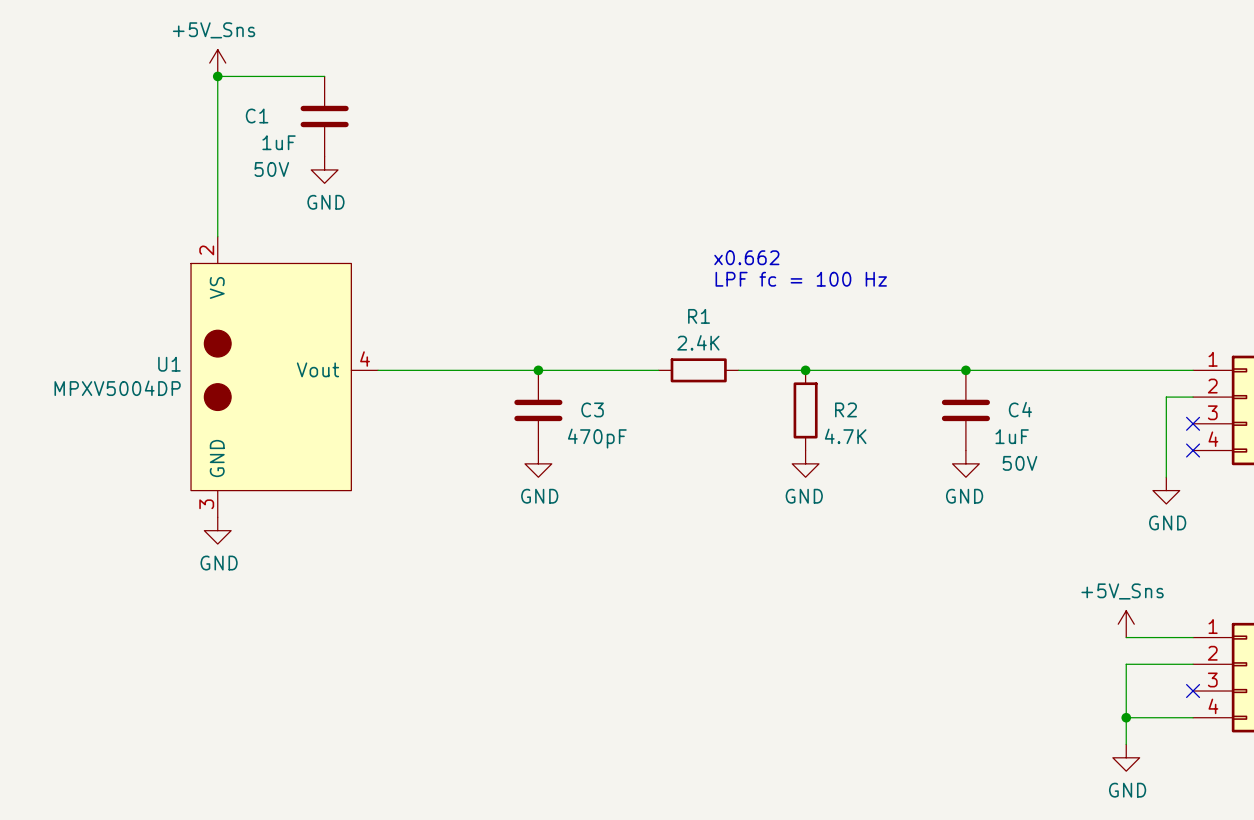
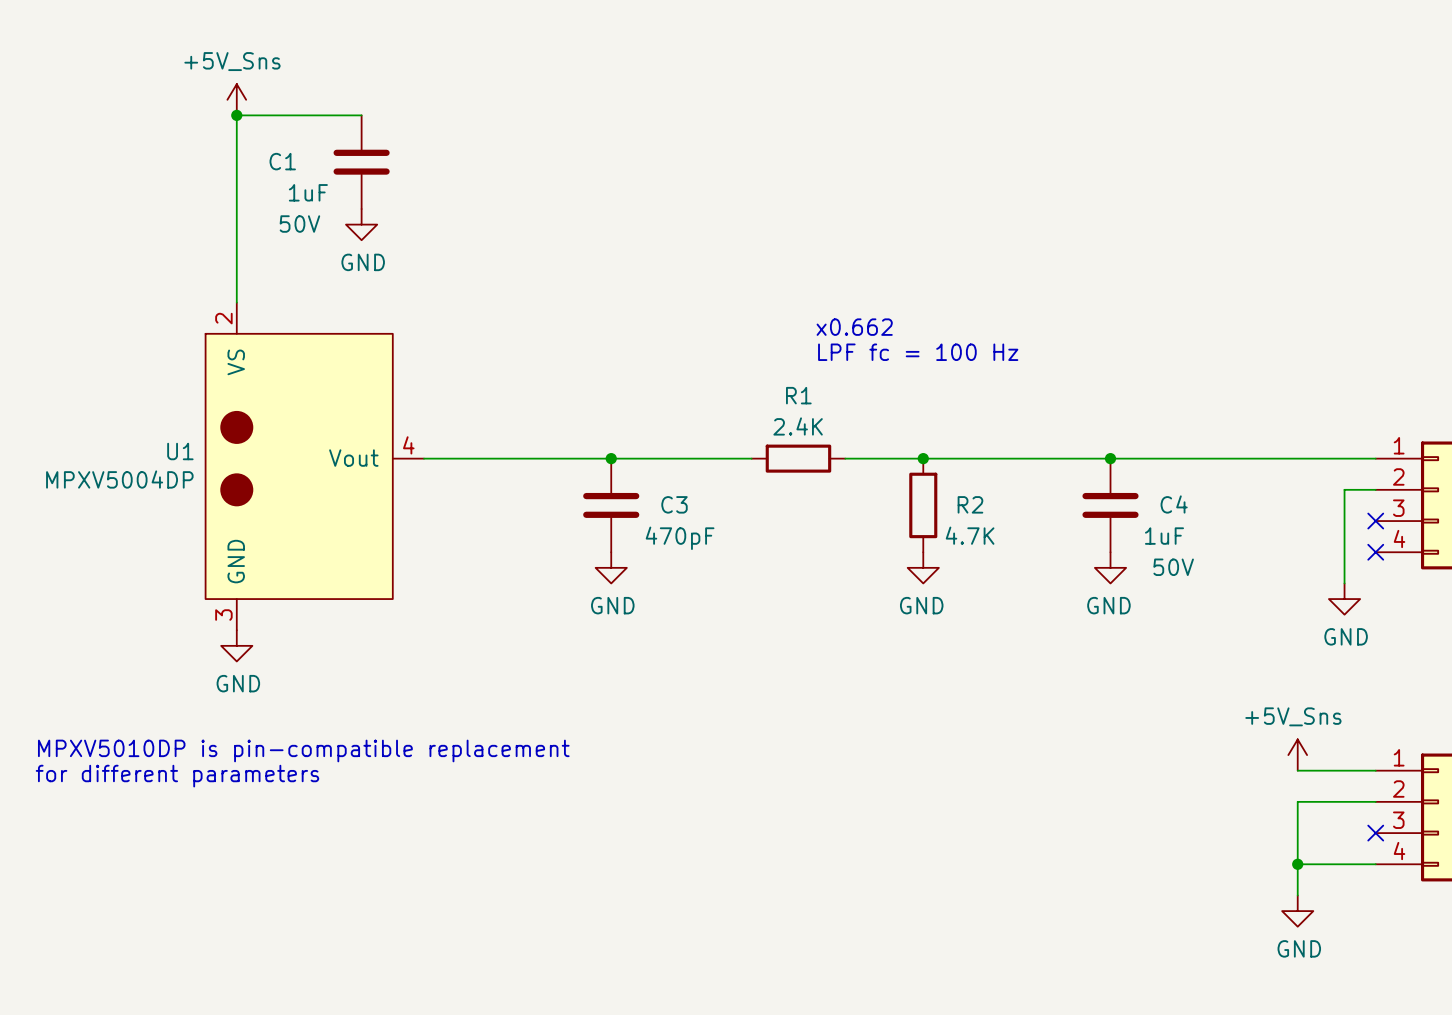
text: none -> MPXV5010DP is pin-compatible replacement (303, 750)
text: none -> for different parameters (177, 776)

